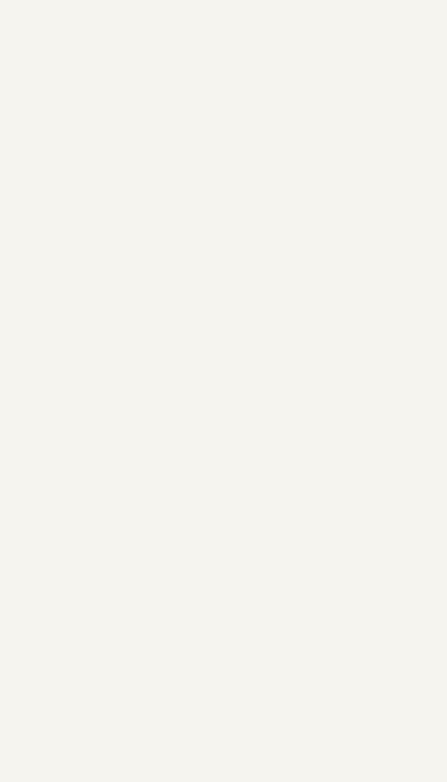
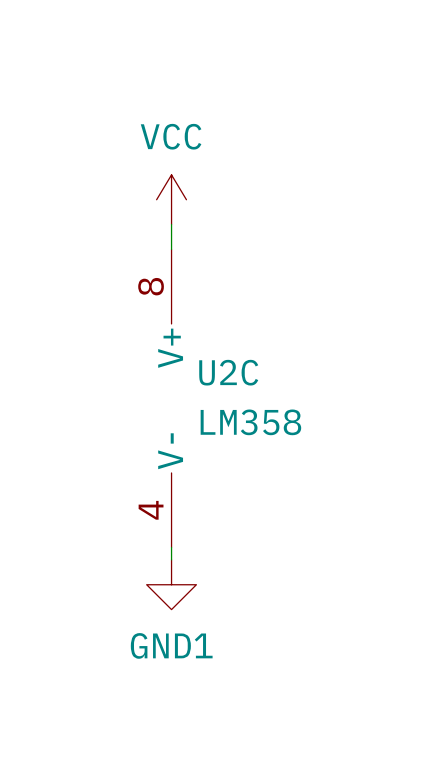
power symbol: none -> VCC (171, 199)
wire: none -> (171, 224) (171, 249)
U2C: none -> LM358 (171, 398)
wire: none -> (171, 547) (171, 559)
power symbol: none -> GND1 (171, 584)

